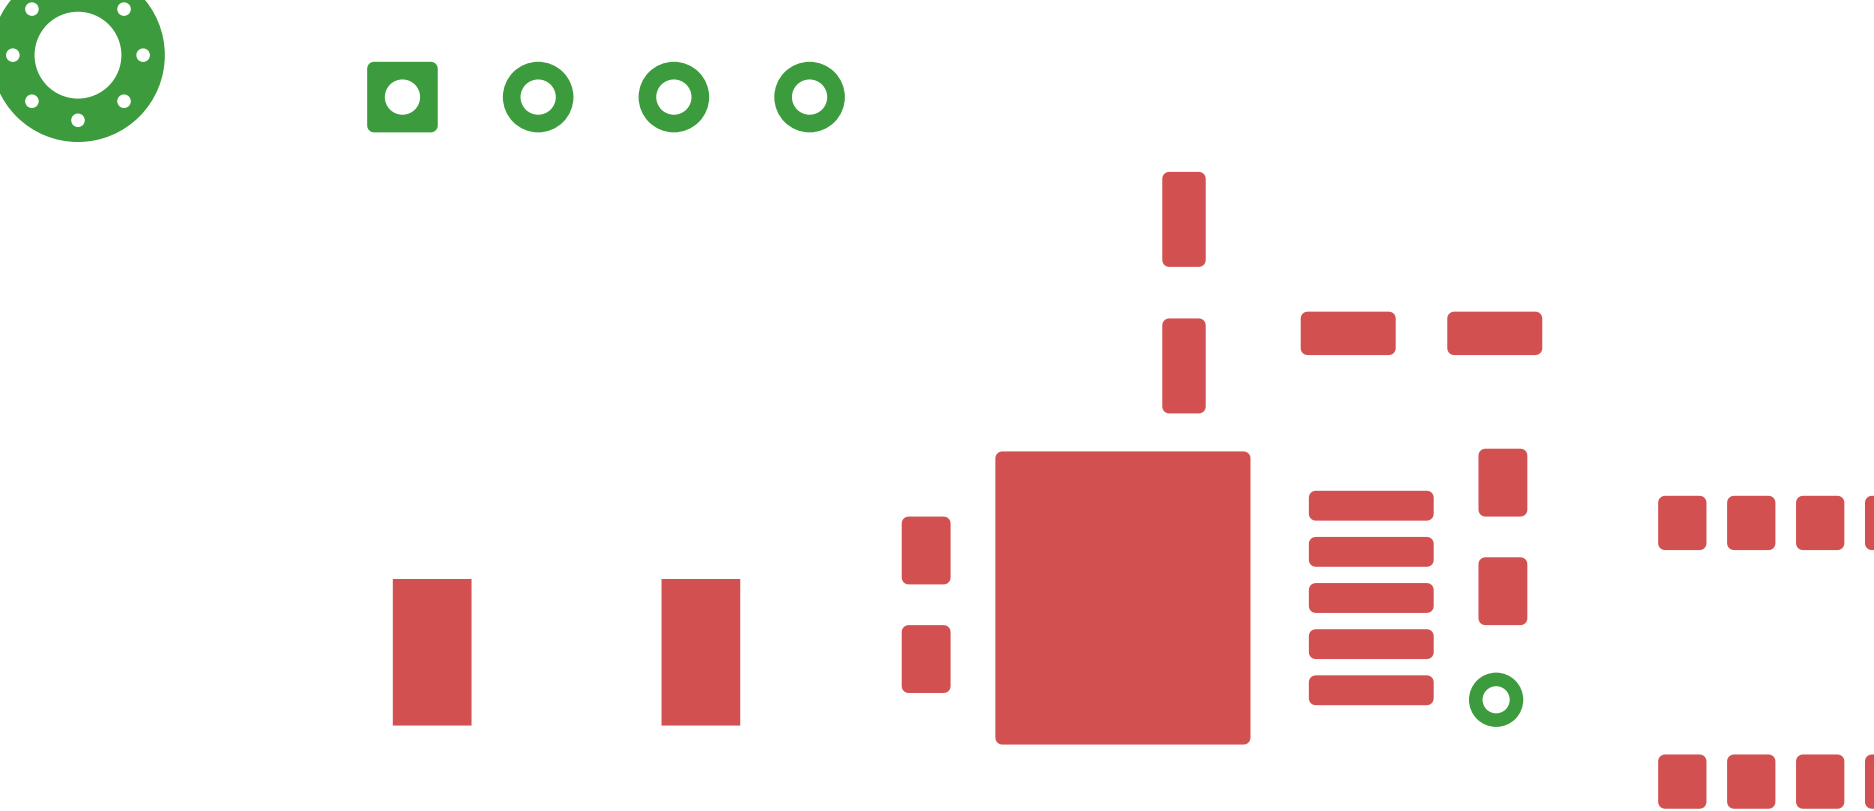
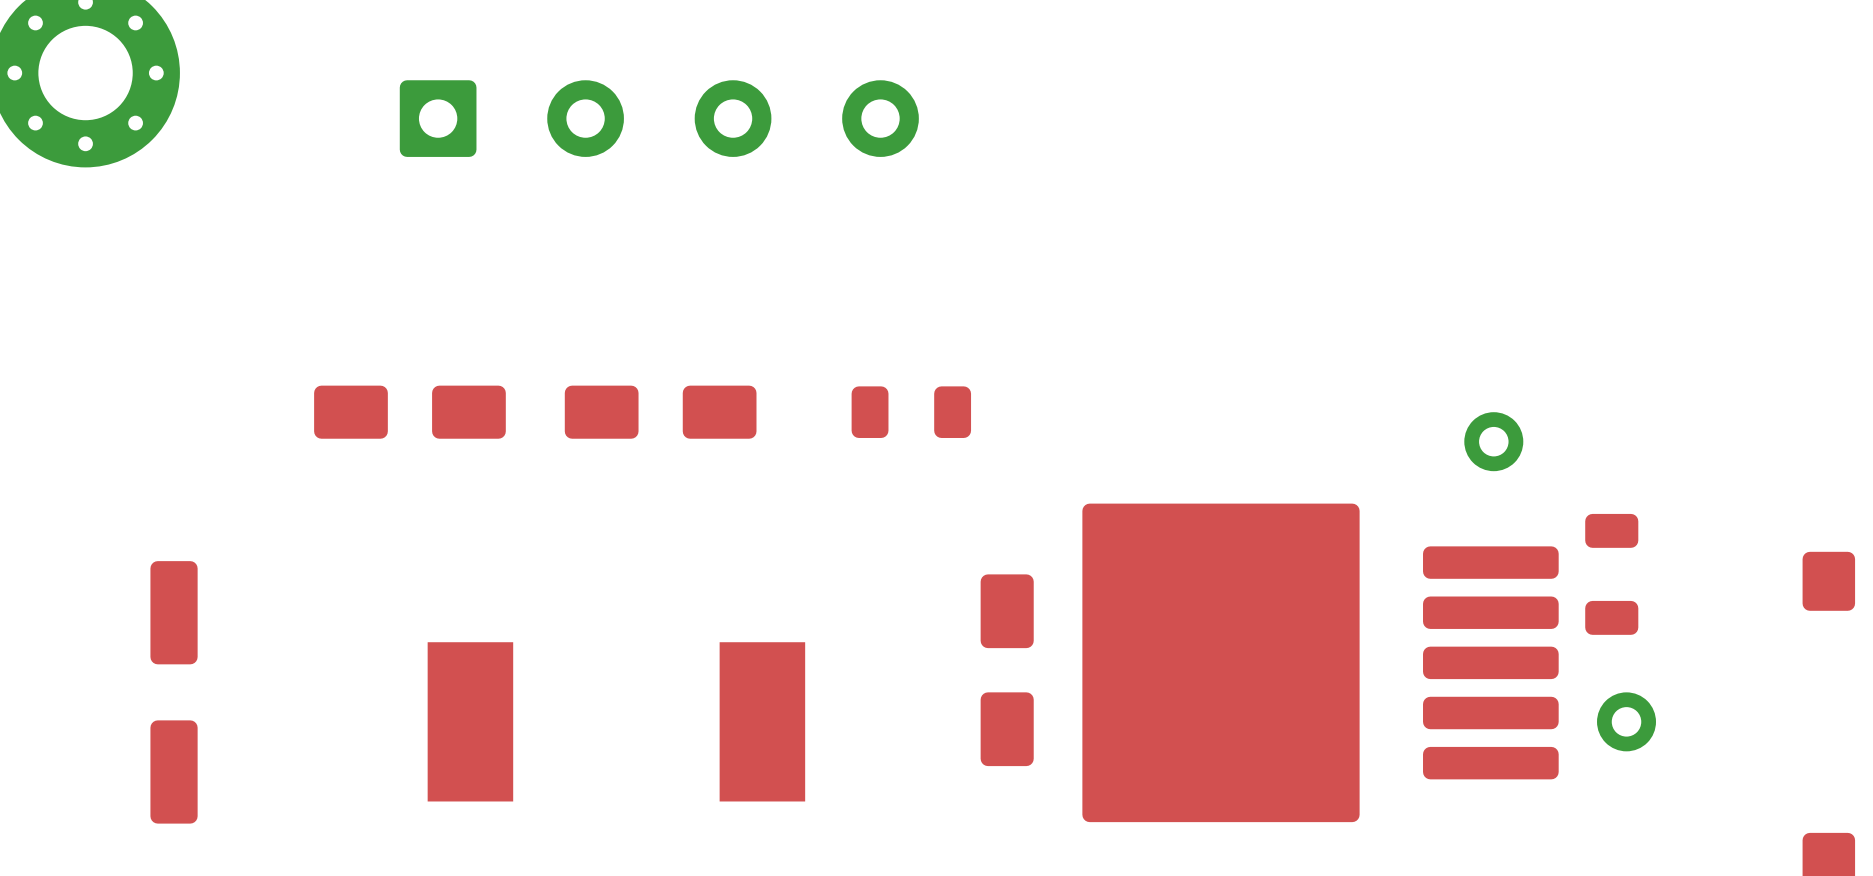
part: (1183, 292) -> none
part: (1421, 333) -> none
part: none -> (409, 412)
part: none -> (660, 412)
part: none -> (911, 412)
part: none -> (1493, 441)
part: none -> (1611, 574)
part: (1502, 536) -> none
part: none -> (174, 692)
part position: (1496, 699) -> (1626, 721)

